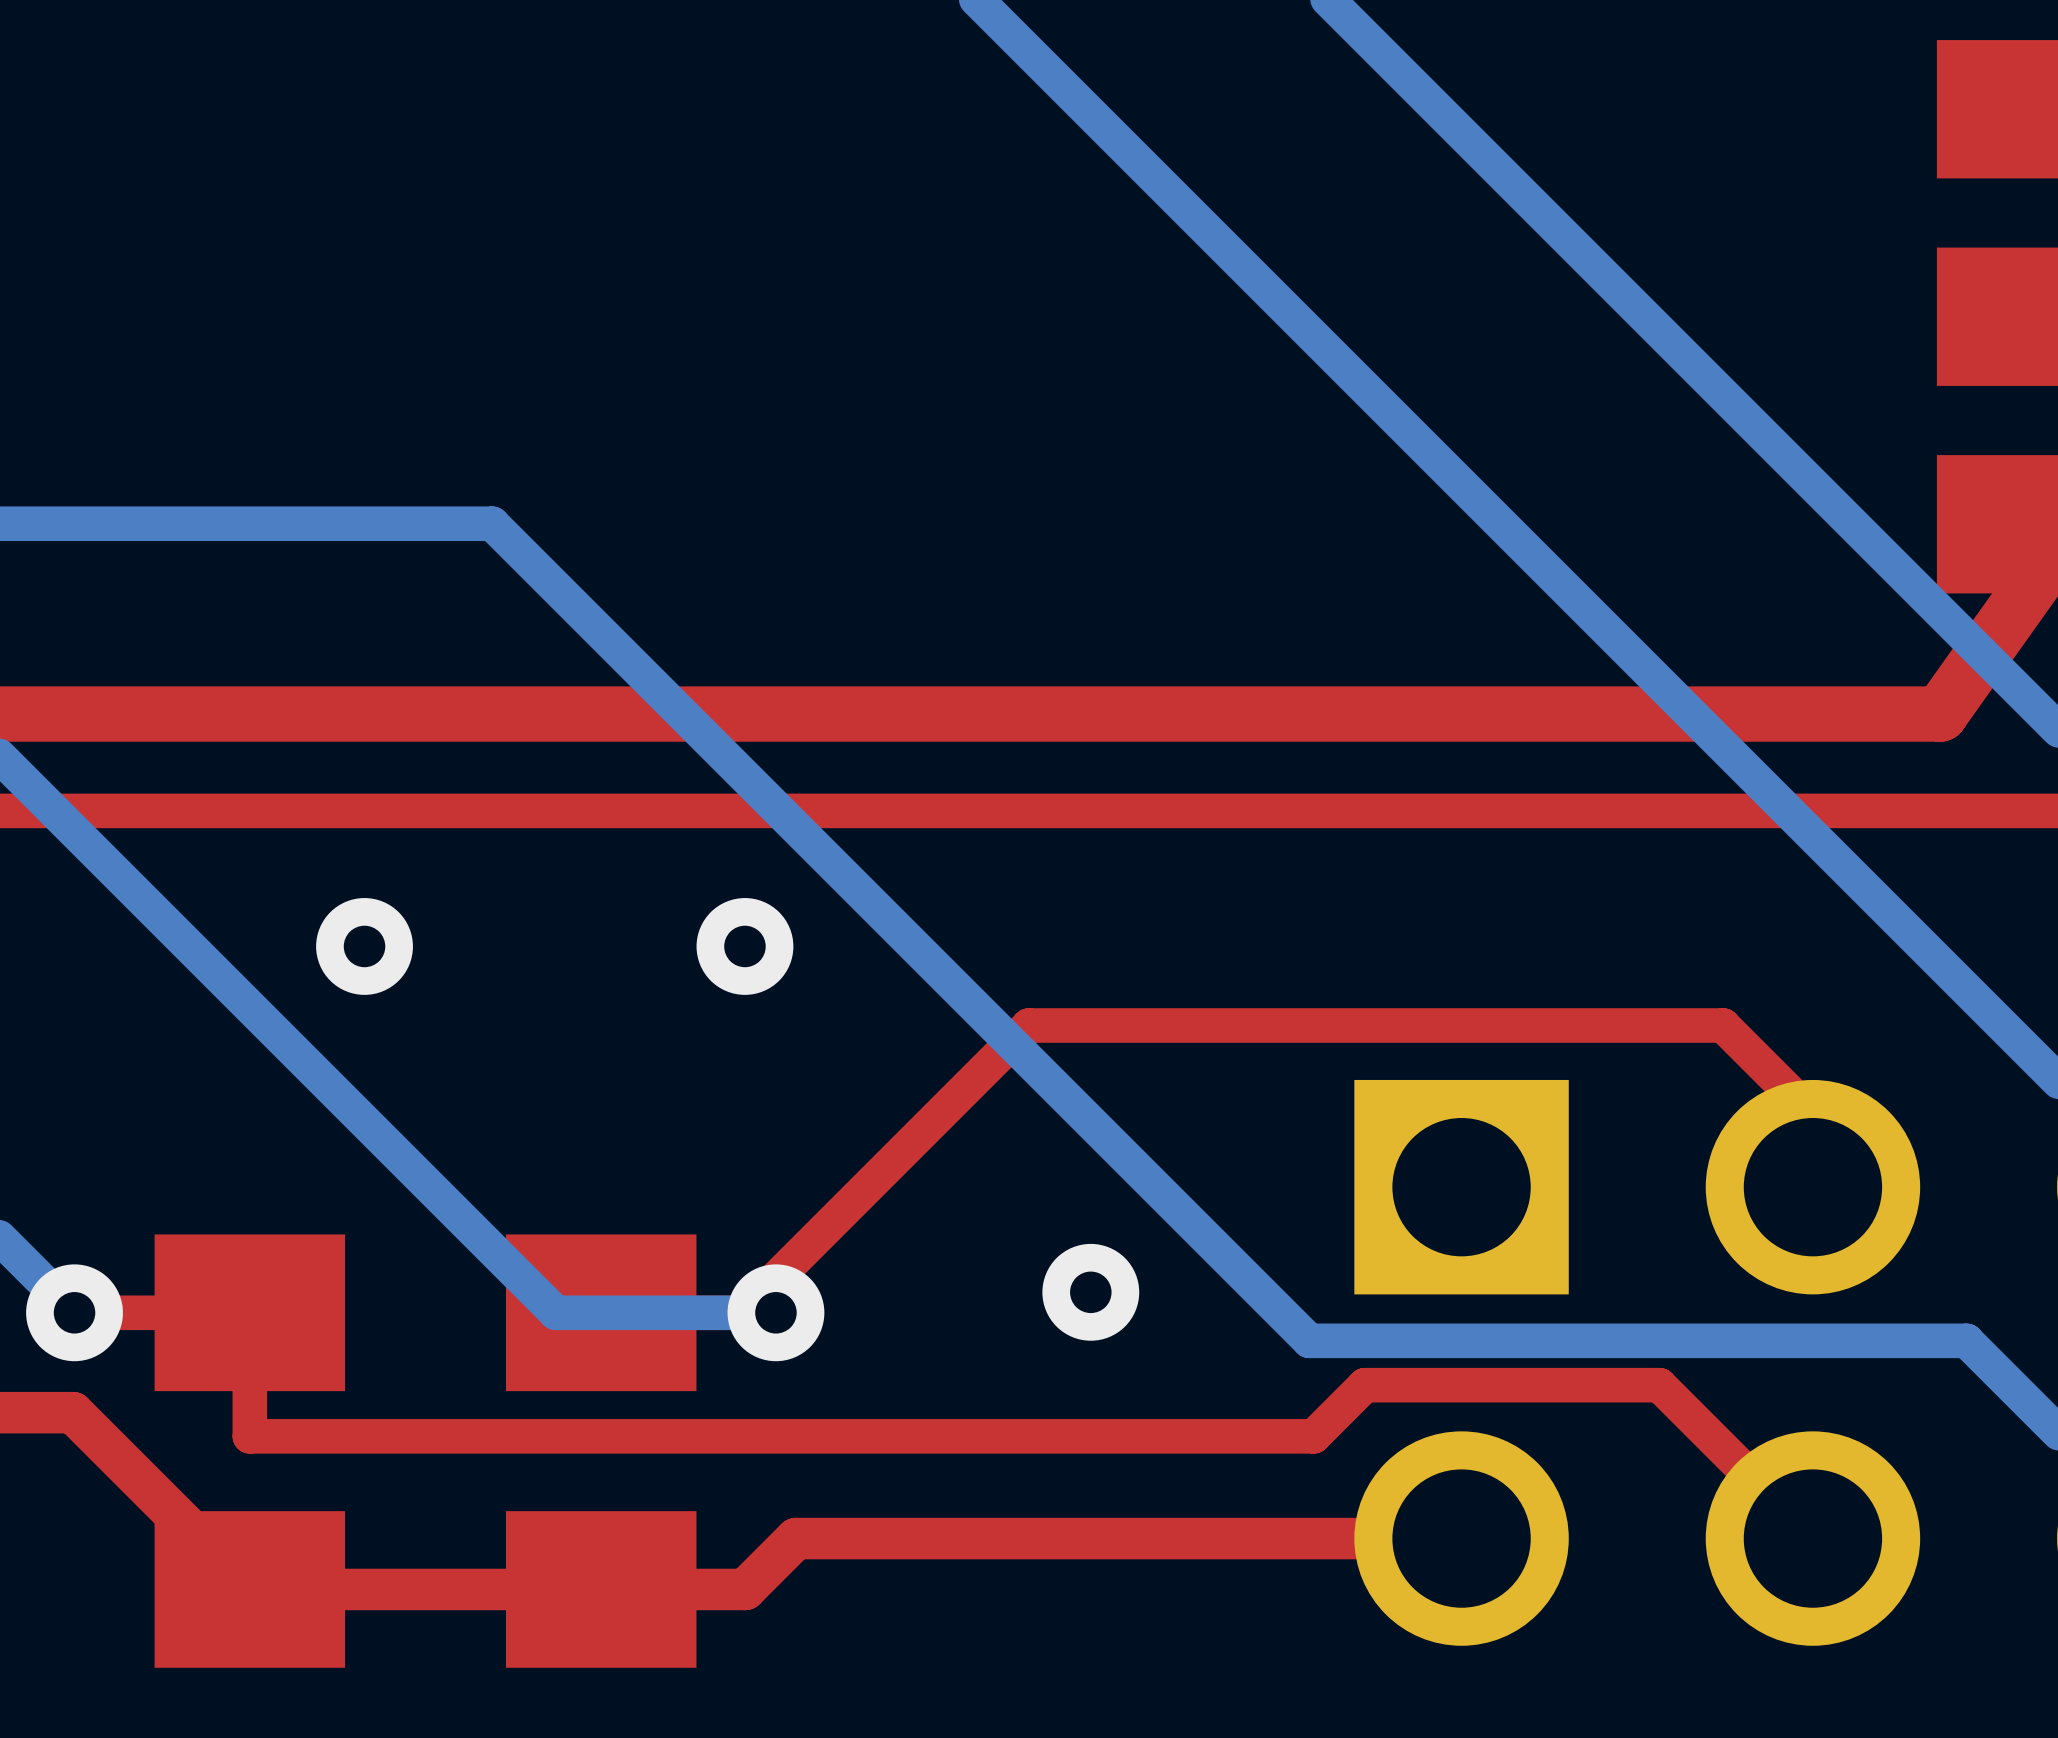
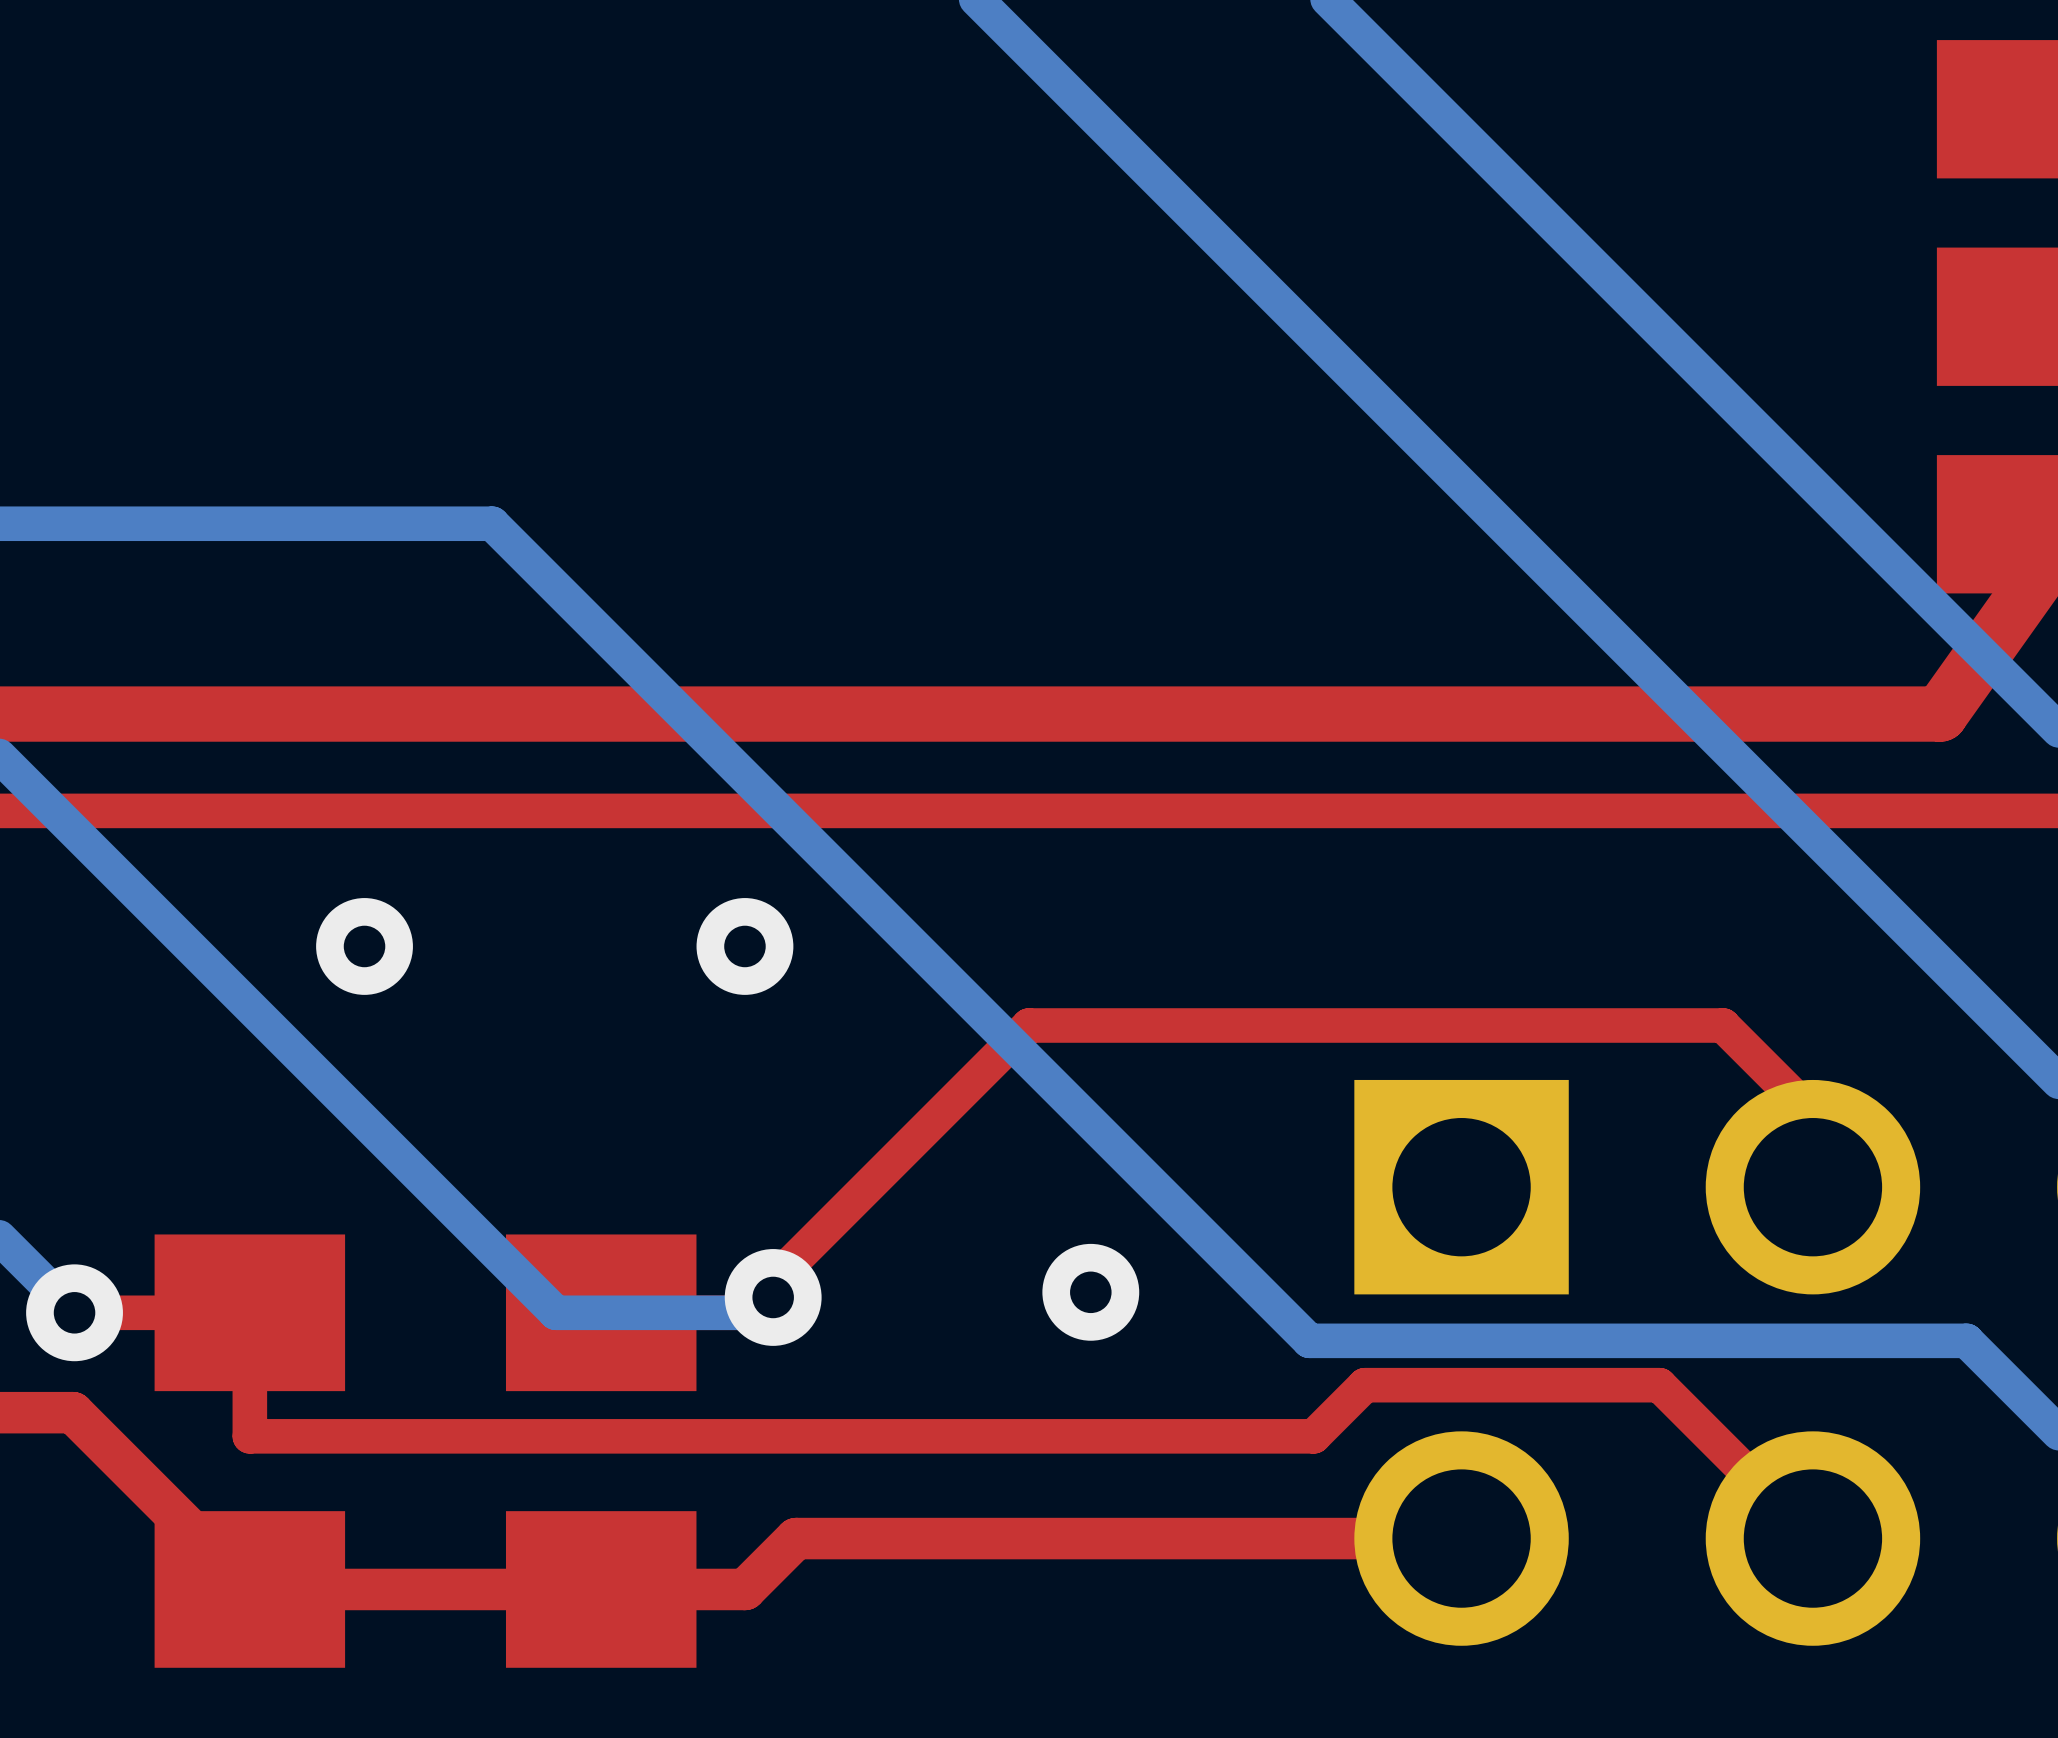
via position: (775, 1312) -> (773, 1297)

